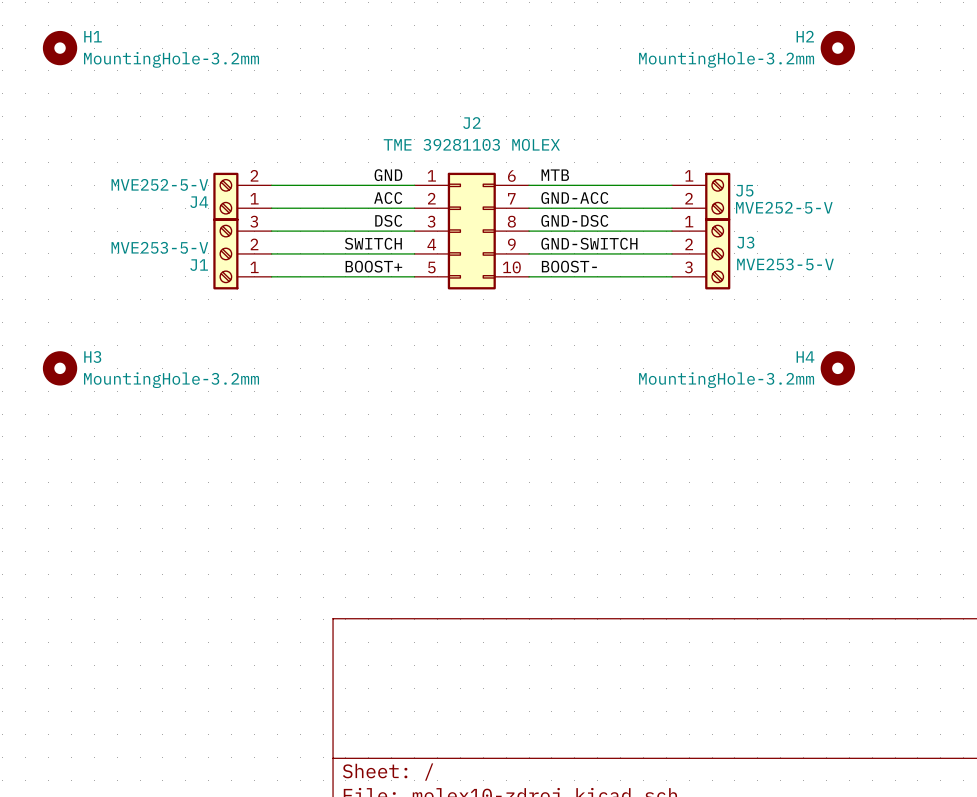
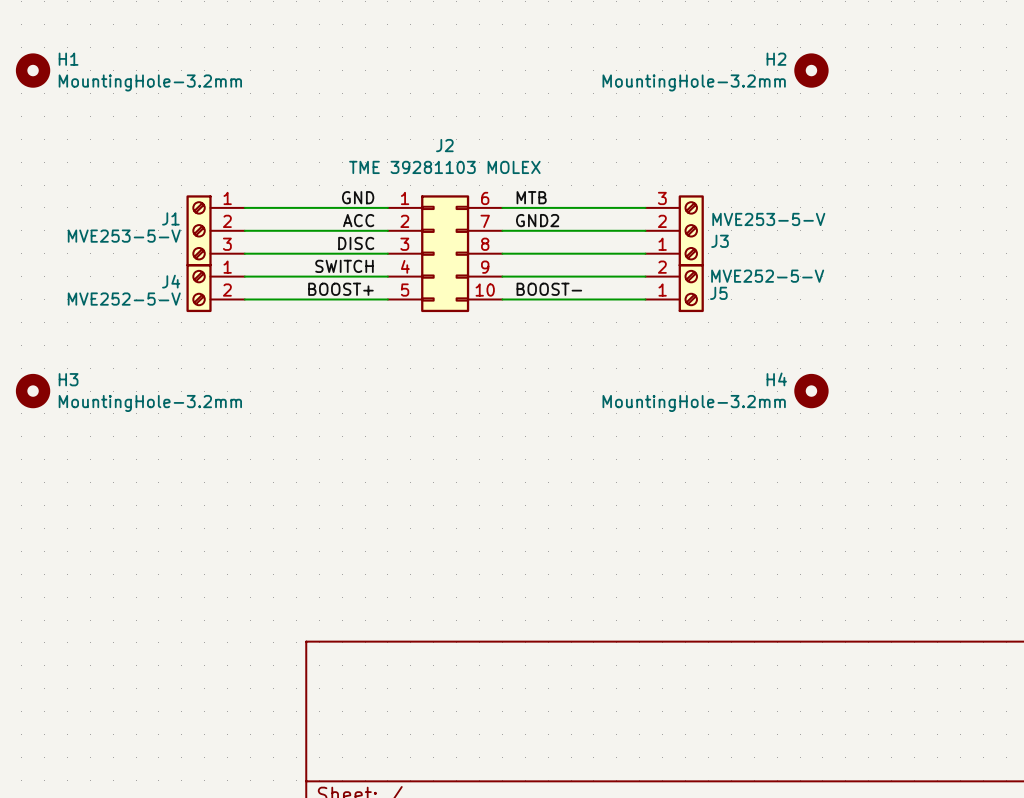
J4 flip: as is (225, 196) -> up-down (199, 288)
J4 position: (242, 196) -> (215, 288)
J5 position: (701, 196) -> (674, 288)
J5 flip: as is (717, 196) -> up-down (691, 288)
label: GND-ACC (574, 198) -> GND2 (537, 220)
label: DSC (388, 220) -> DISC (356, 243)
label: GND-DSC (574, 220) -> none
label: GND-SWITCH (589, 243) -> none
J1 flip: as is (225, 253) -> up-down (199, 230)
J1 position: (242, 253) -> (215, 230)
J3 position: (701, 253) -> (674, 230)
J3 flip: as is (717, 253) -> up-down (691, 230)

